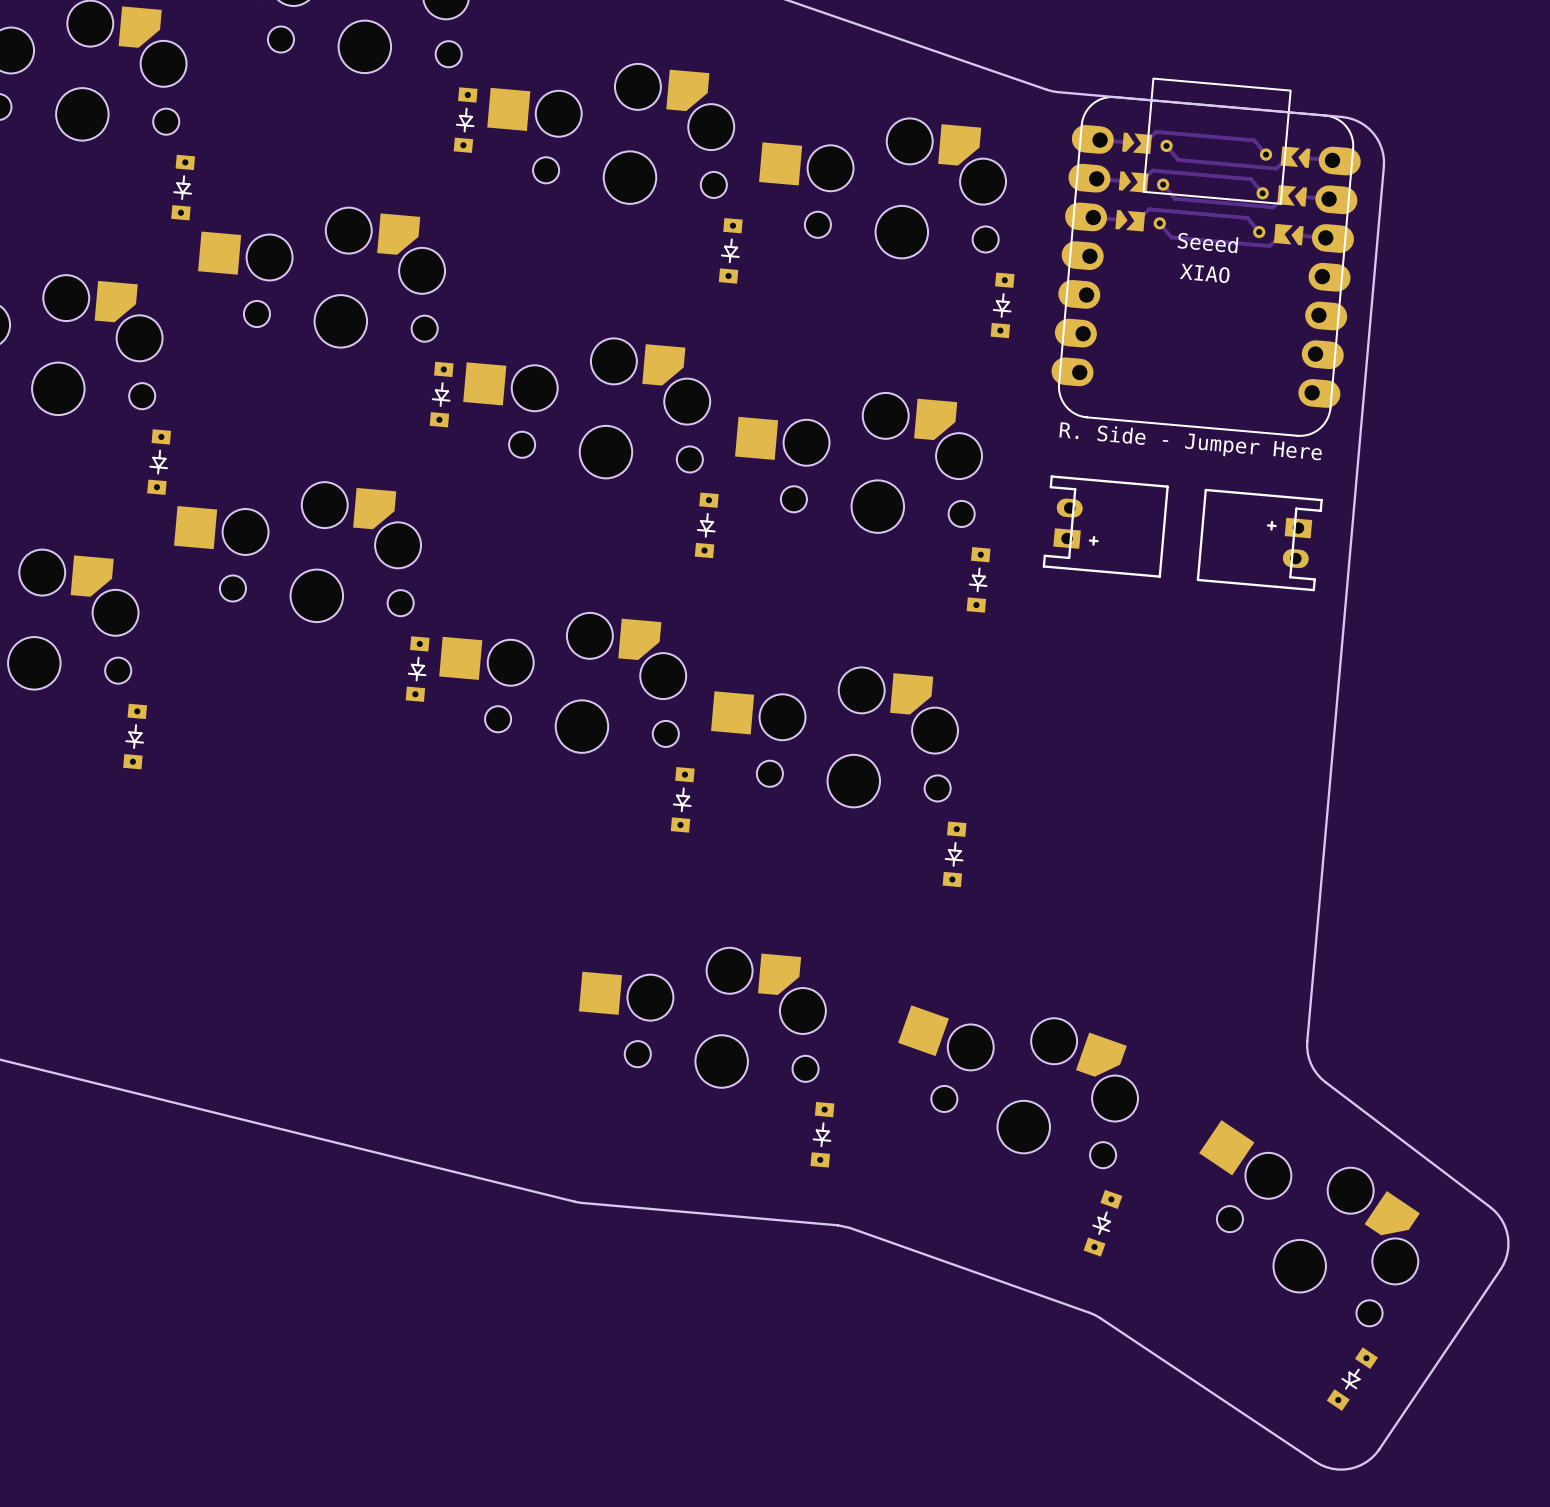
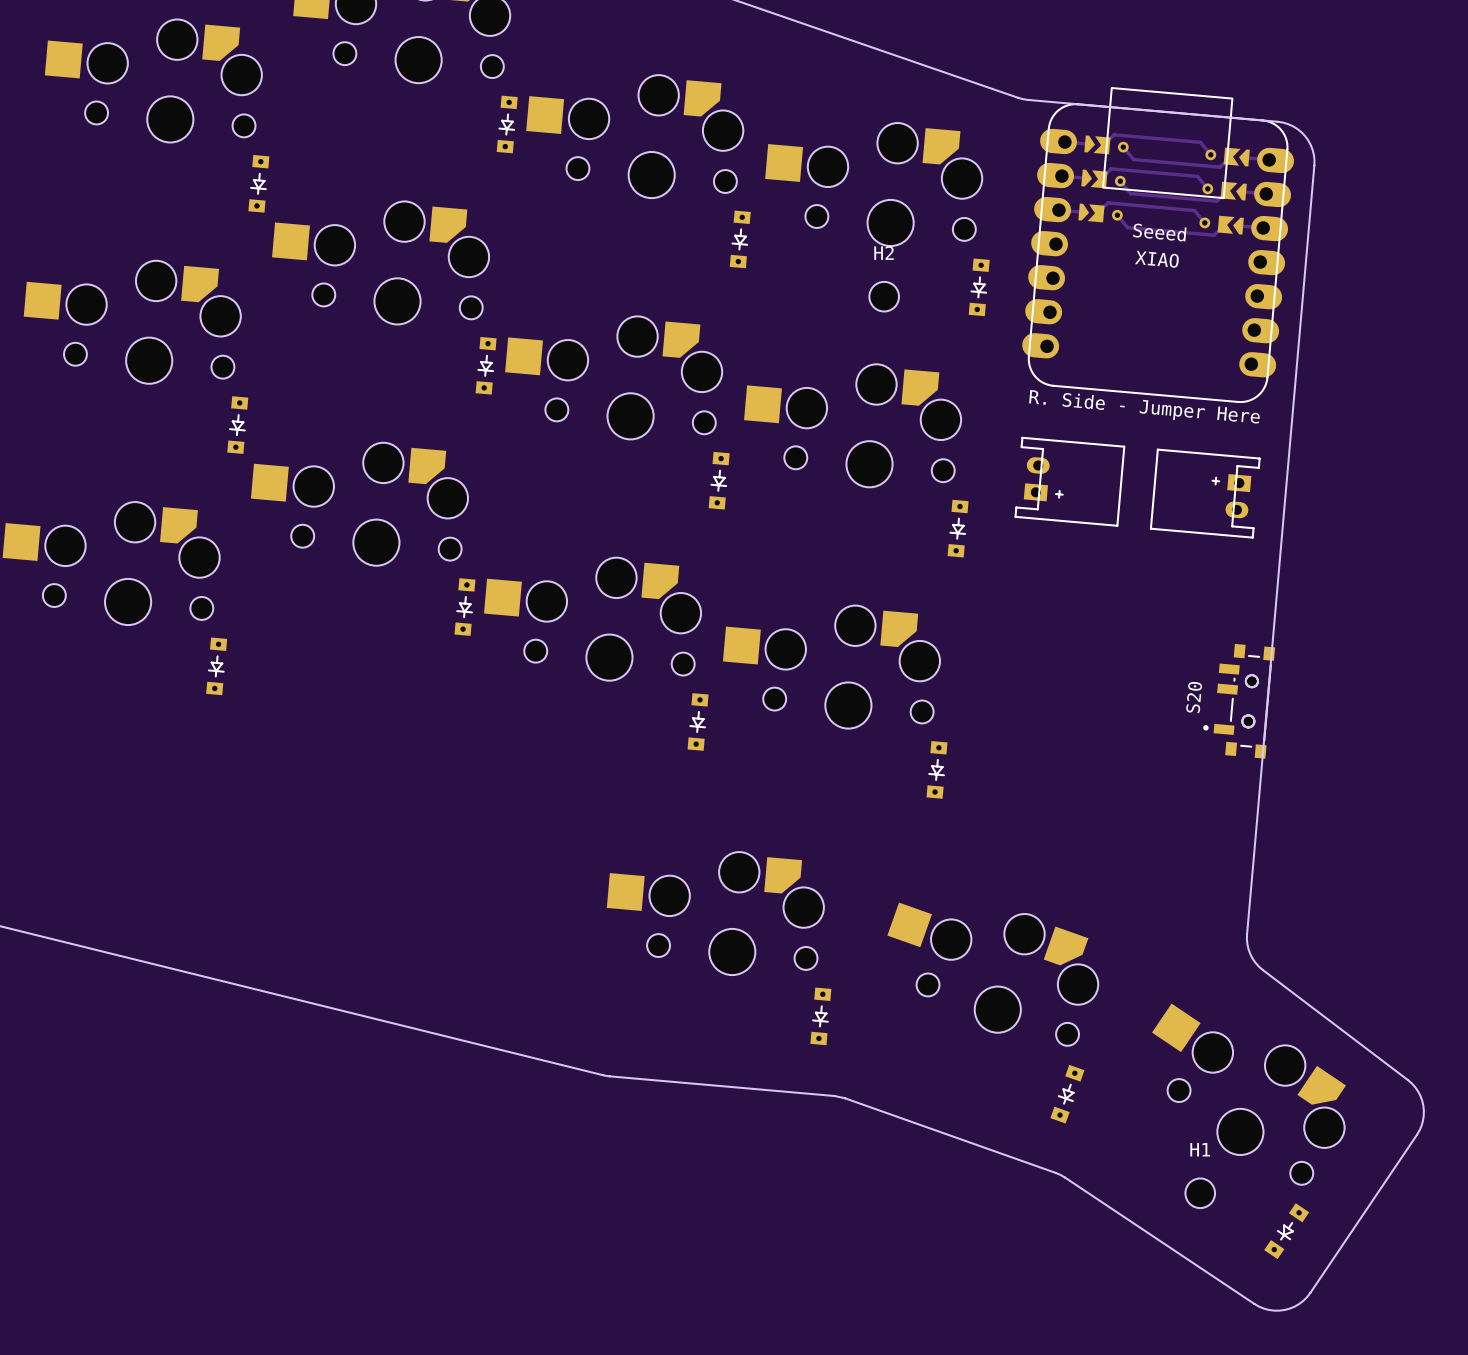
H2: none -> (884, 296)
S20: none -> (1239, 701)
part: none -> (1250, 701)
H1: none -> (1200, 1193)

